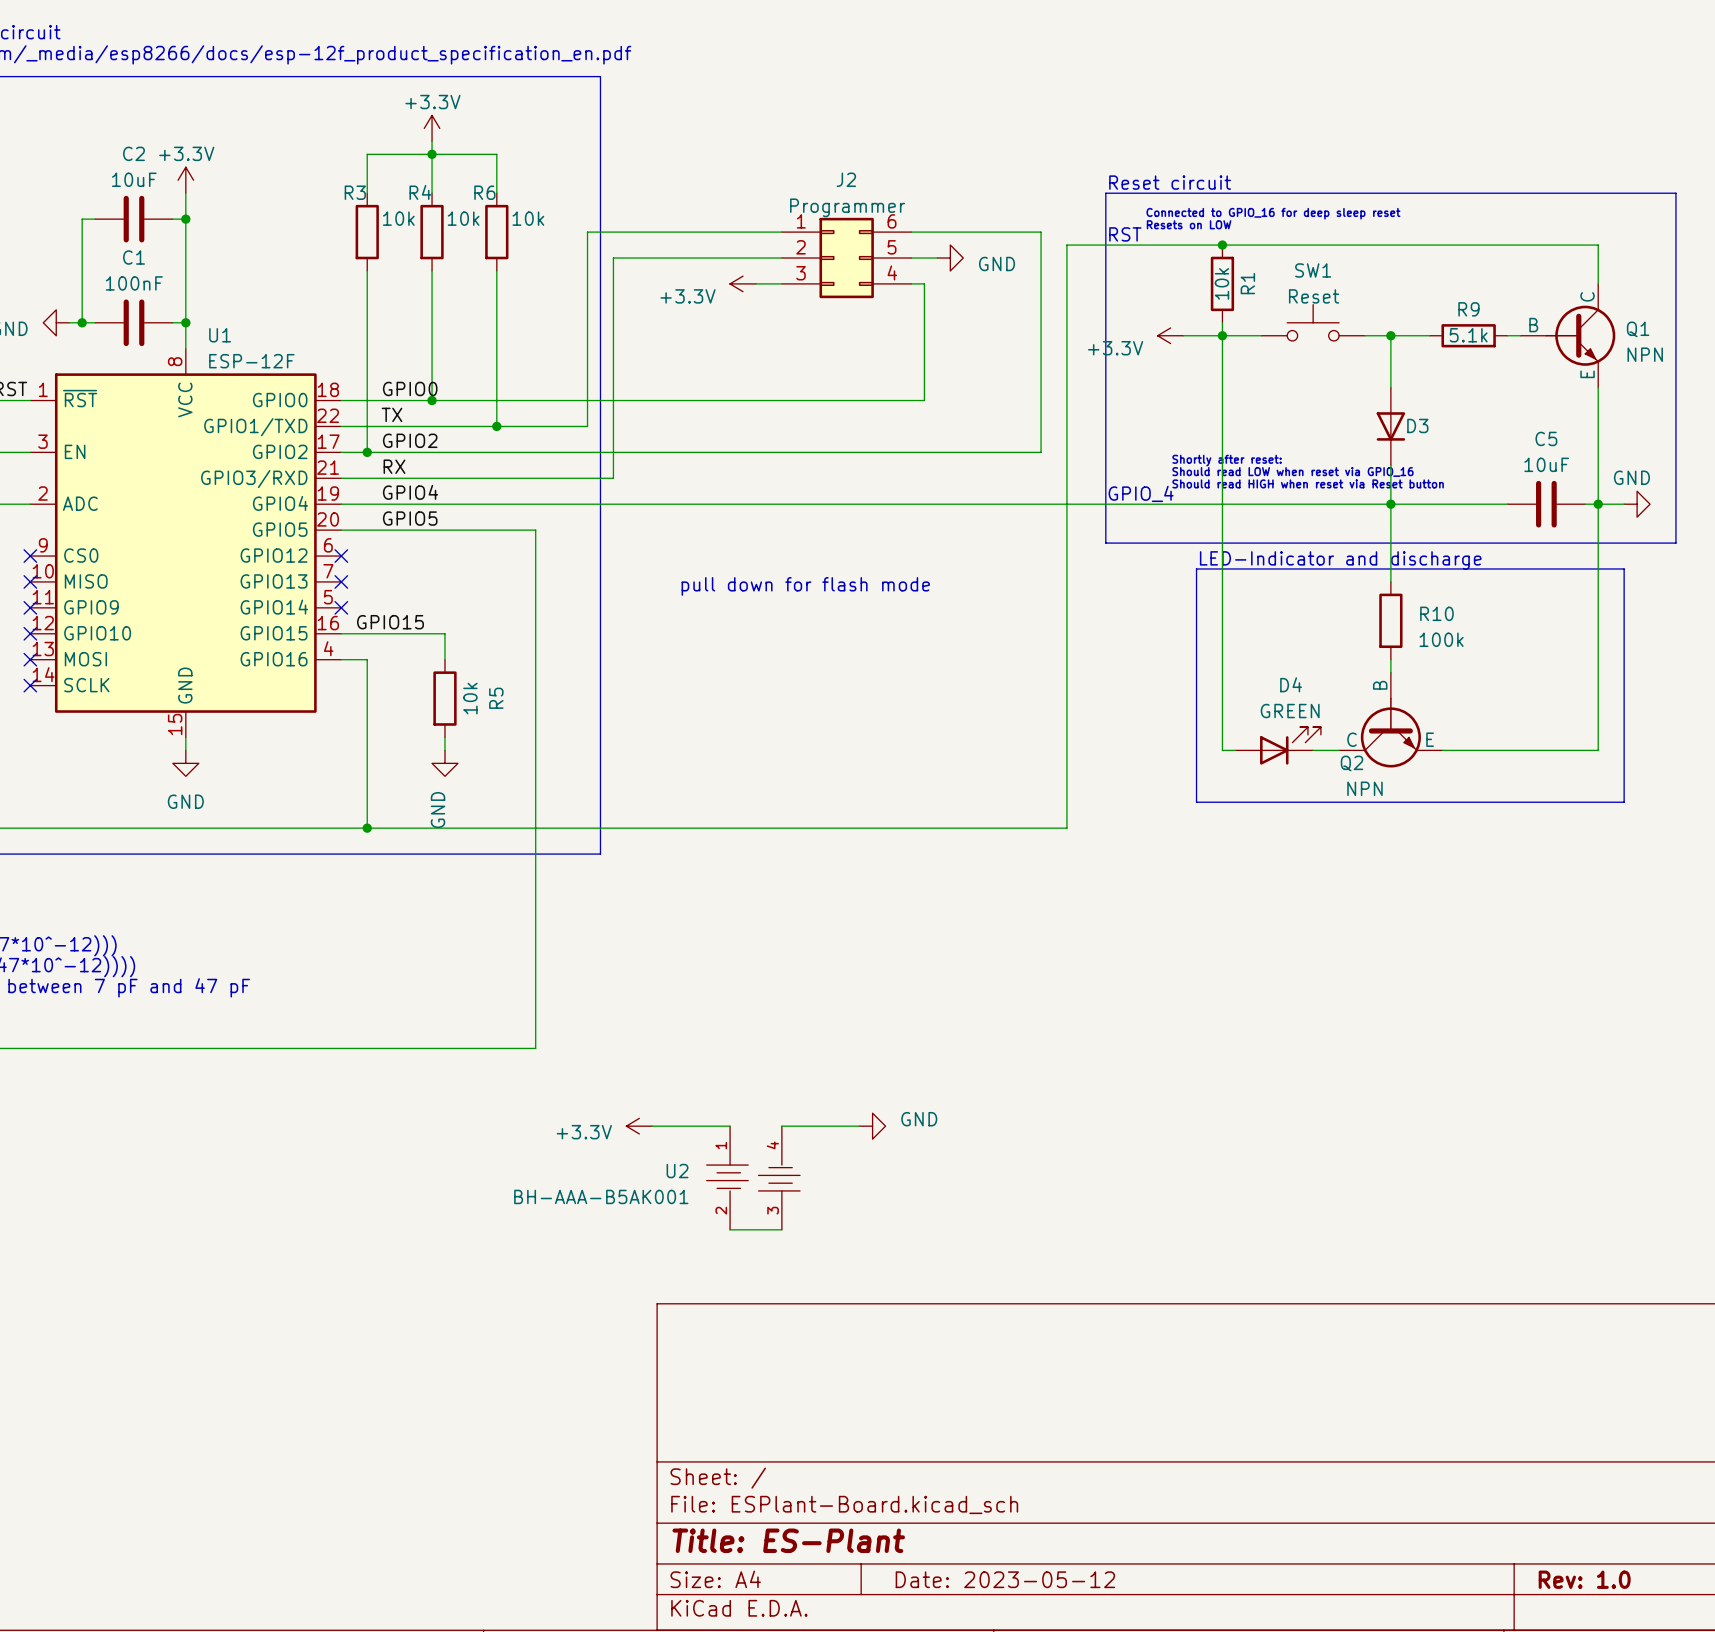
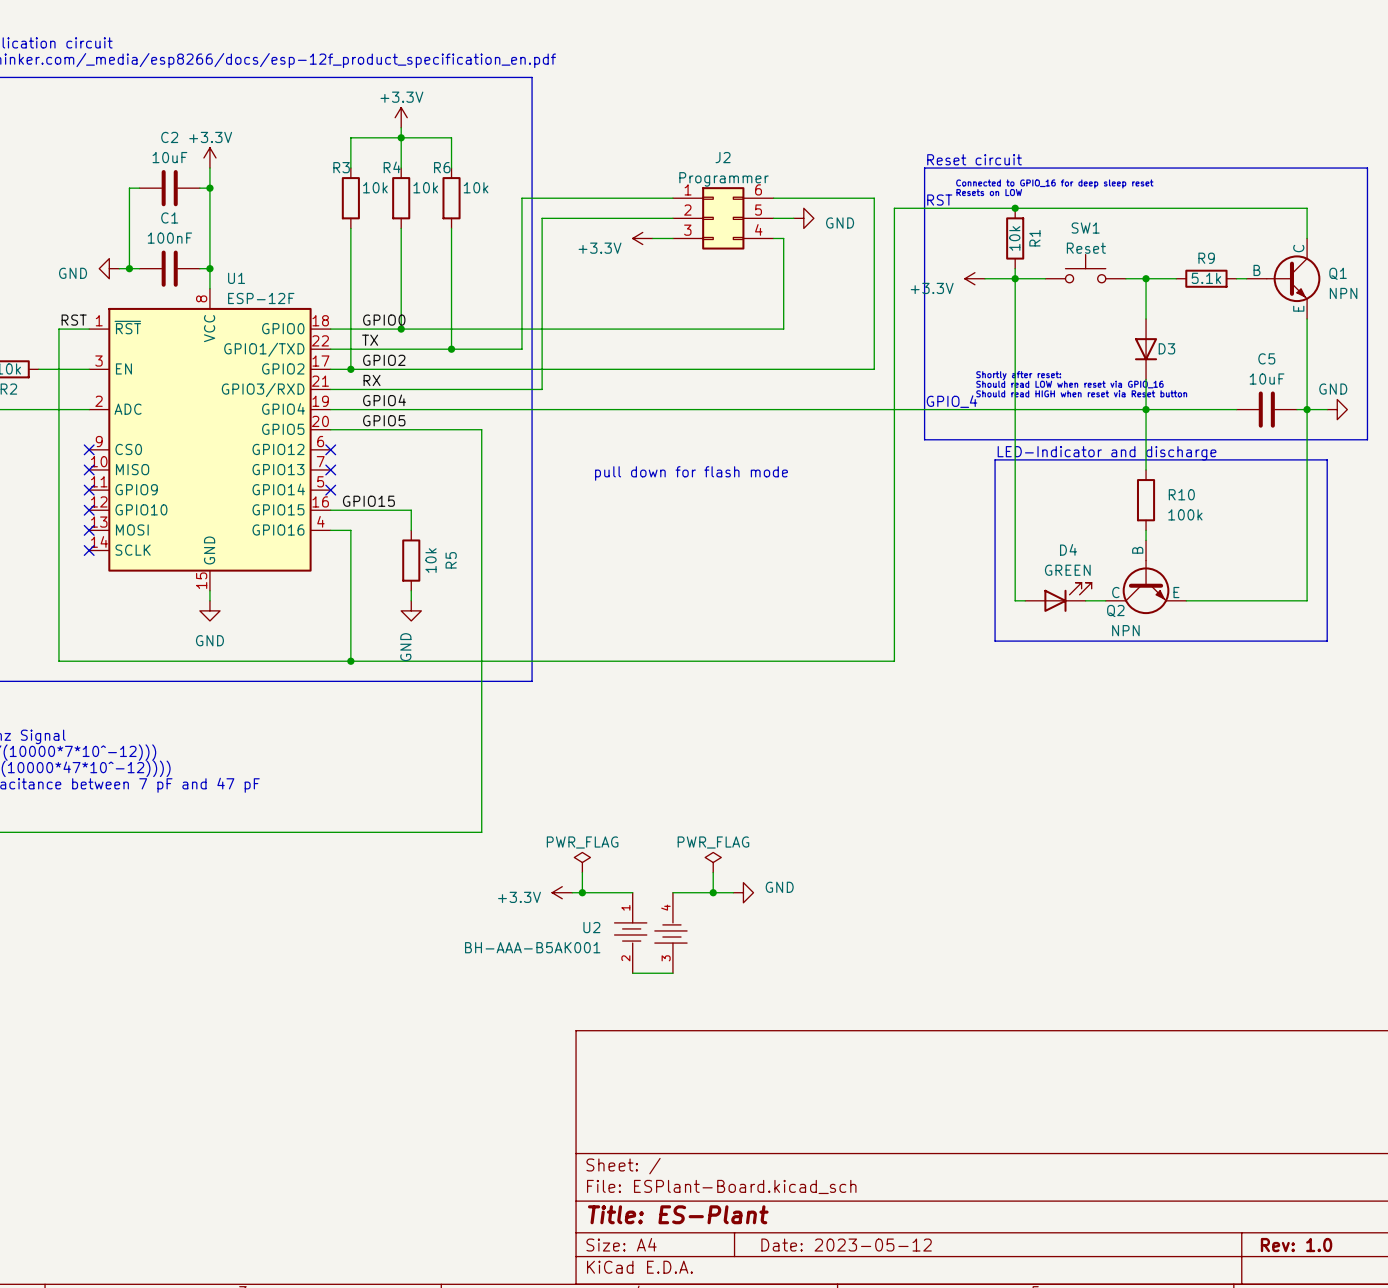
power symbol: none -> PWR_FLAG (582, 862)
power symbol: none -> PWR_FLAG (713, 862)
wire: none -> (582, 872) (582, 892)
wire: none -> (713, 872) (713, 892)
junction: none -> (582, 892)
junction: none -> (713, 892)

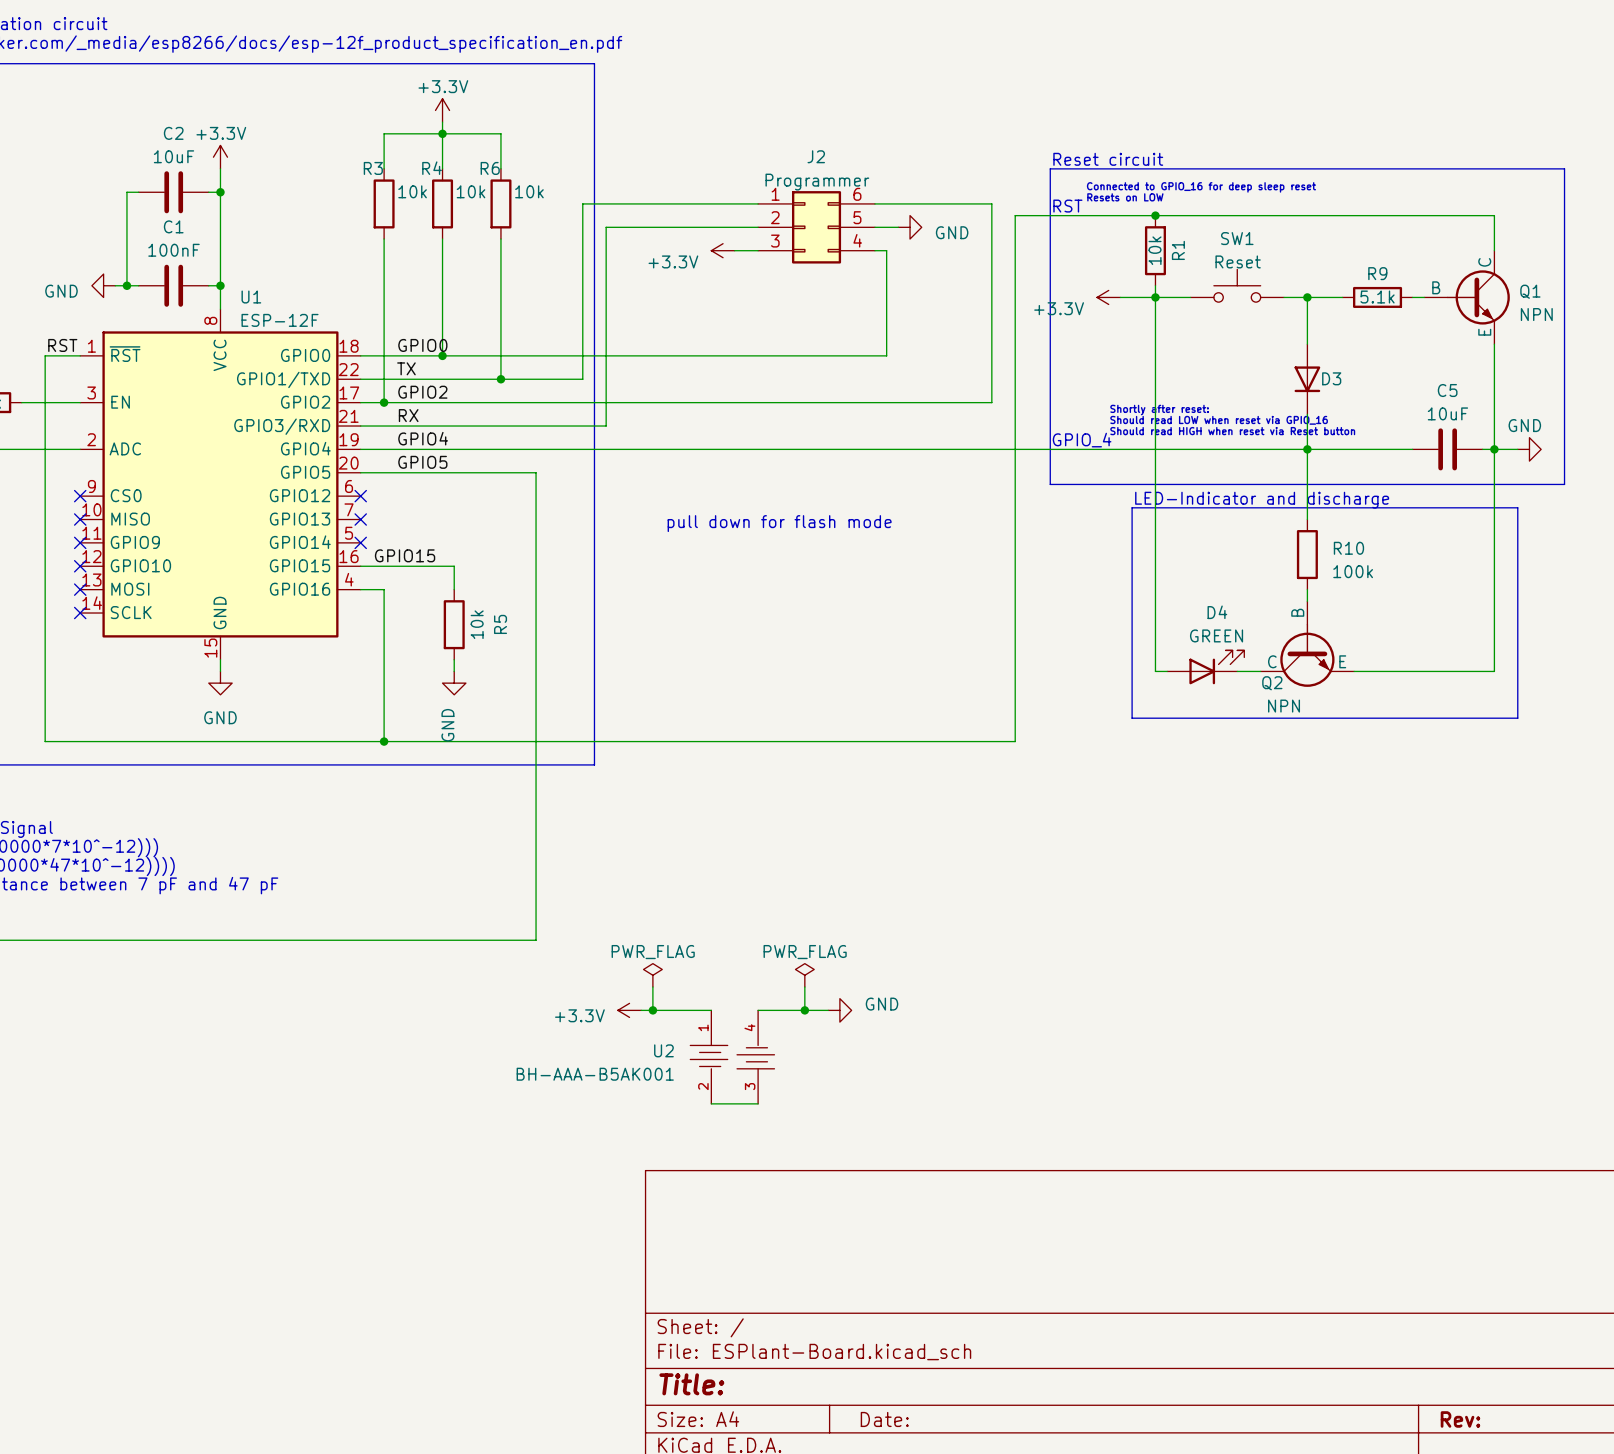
title block: Title: ES-Plant (678, 1214) -> Title: (691, 1384)
title block: Date: 2023-05-12 (846, 1245) -> Date: (884, 1419)
title block: Rev: 1.0 (1296, 1245) -> Rev: (1460, 1419)

